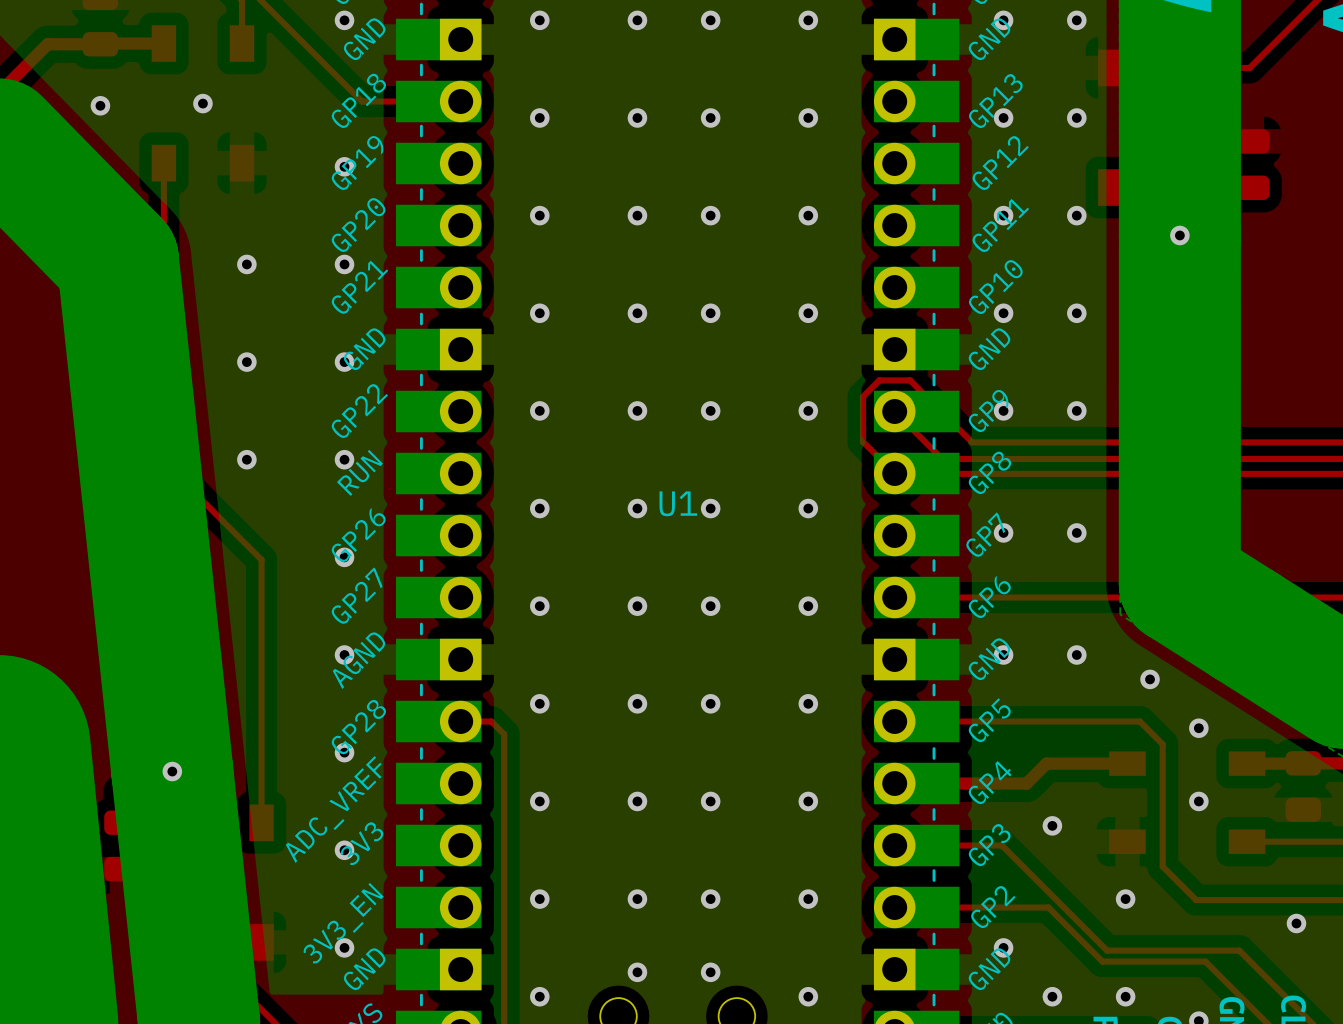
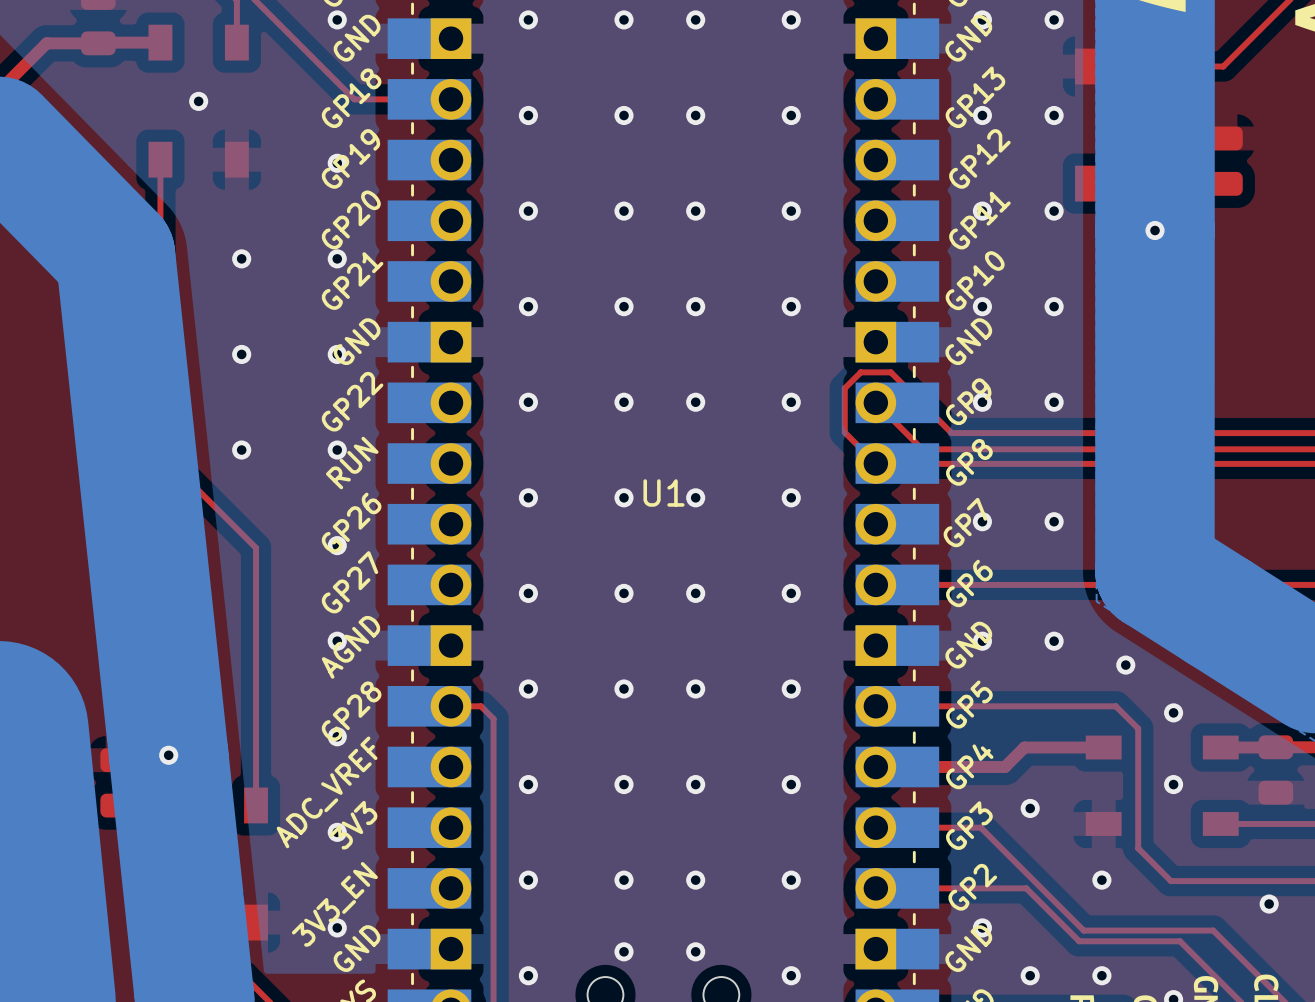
via: (100, 105) -> none
part position: (121, 845) -> (117, 782)

